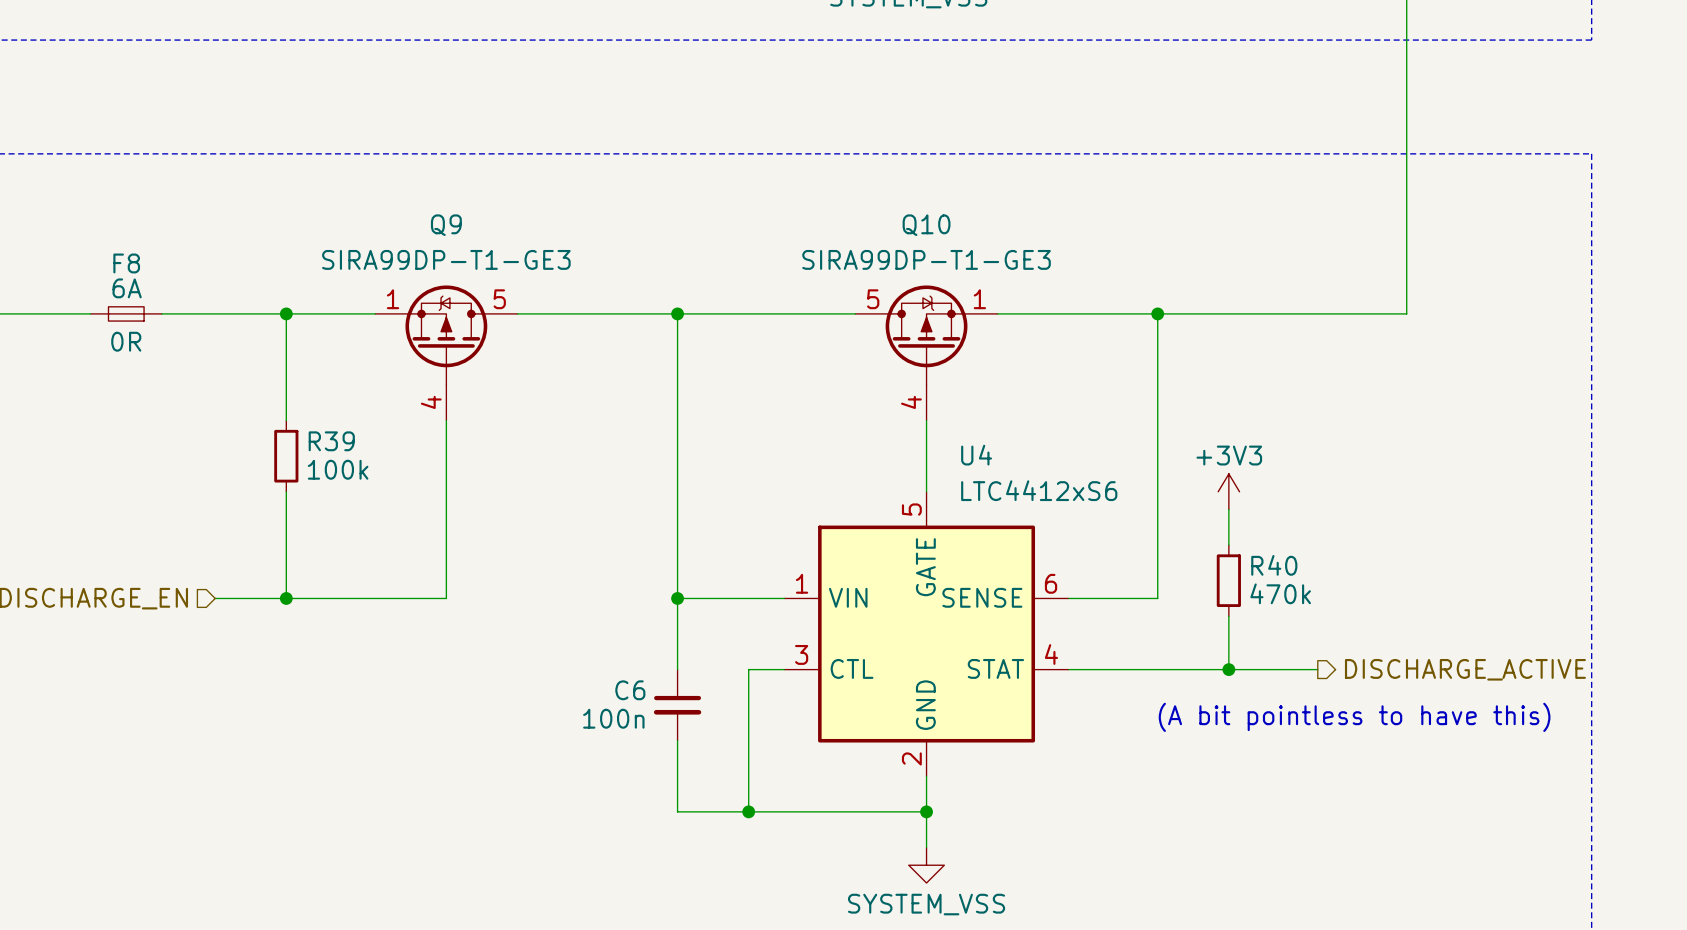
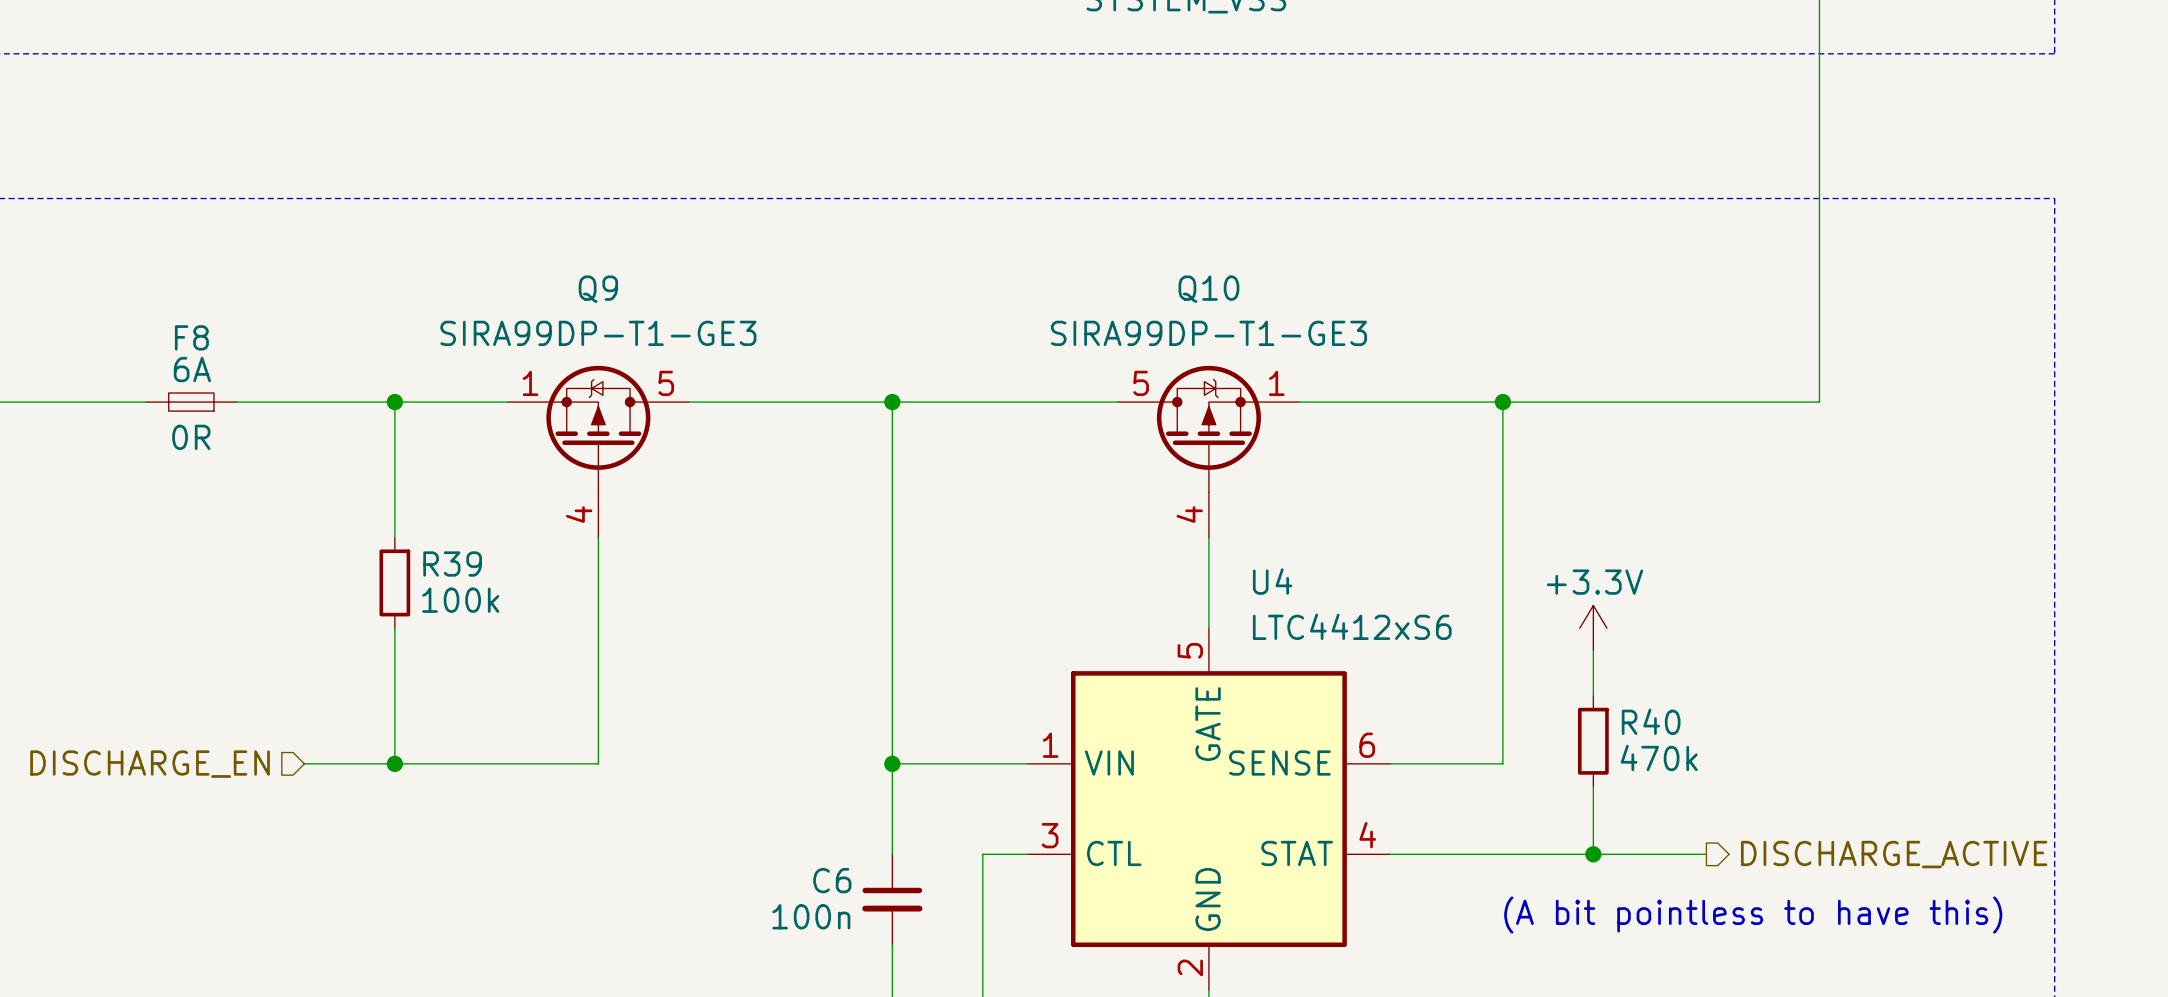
power symbol: +3V3 (1228, 491) -> +3.3V (1593, 628)

